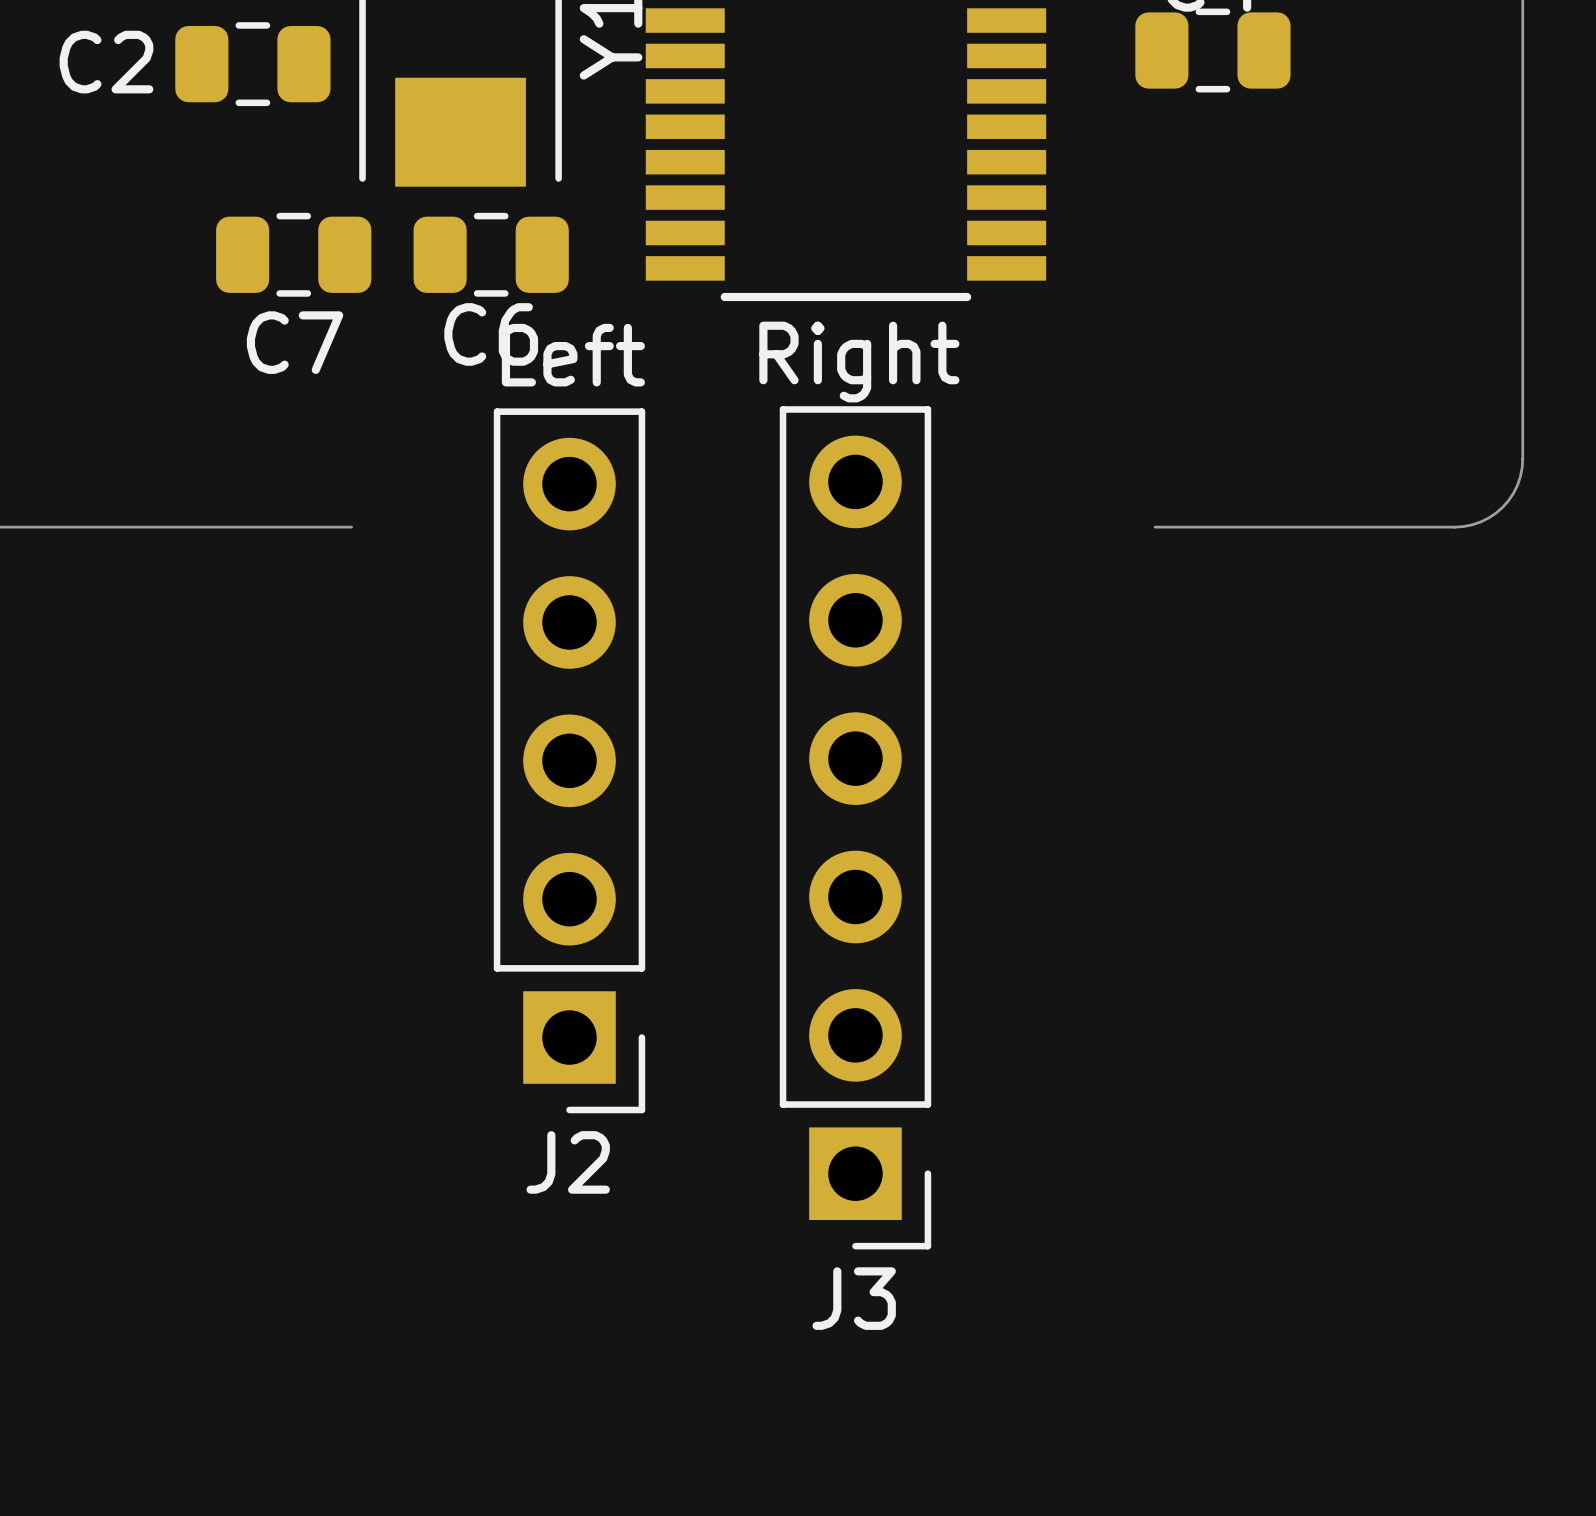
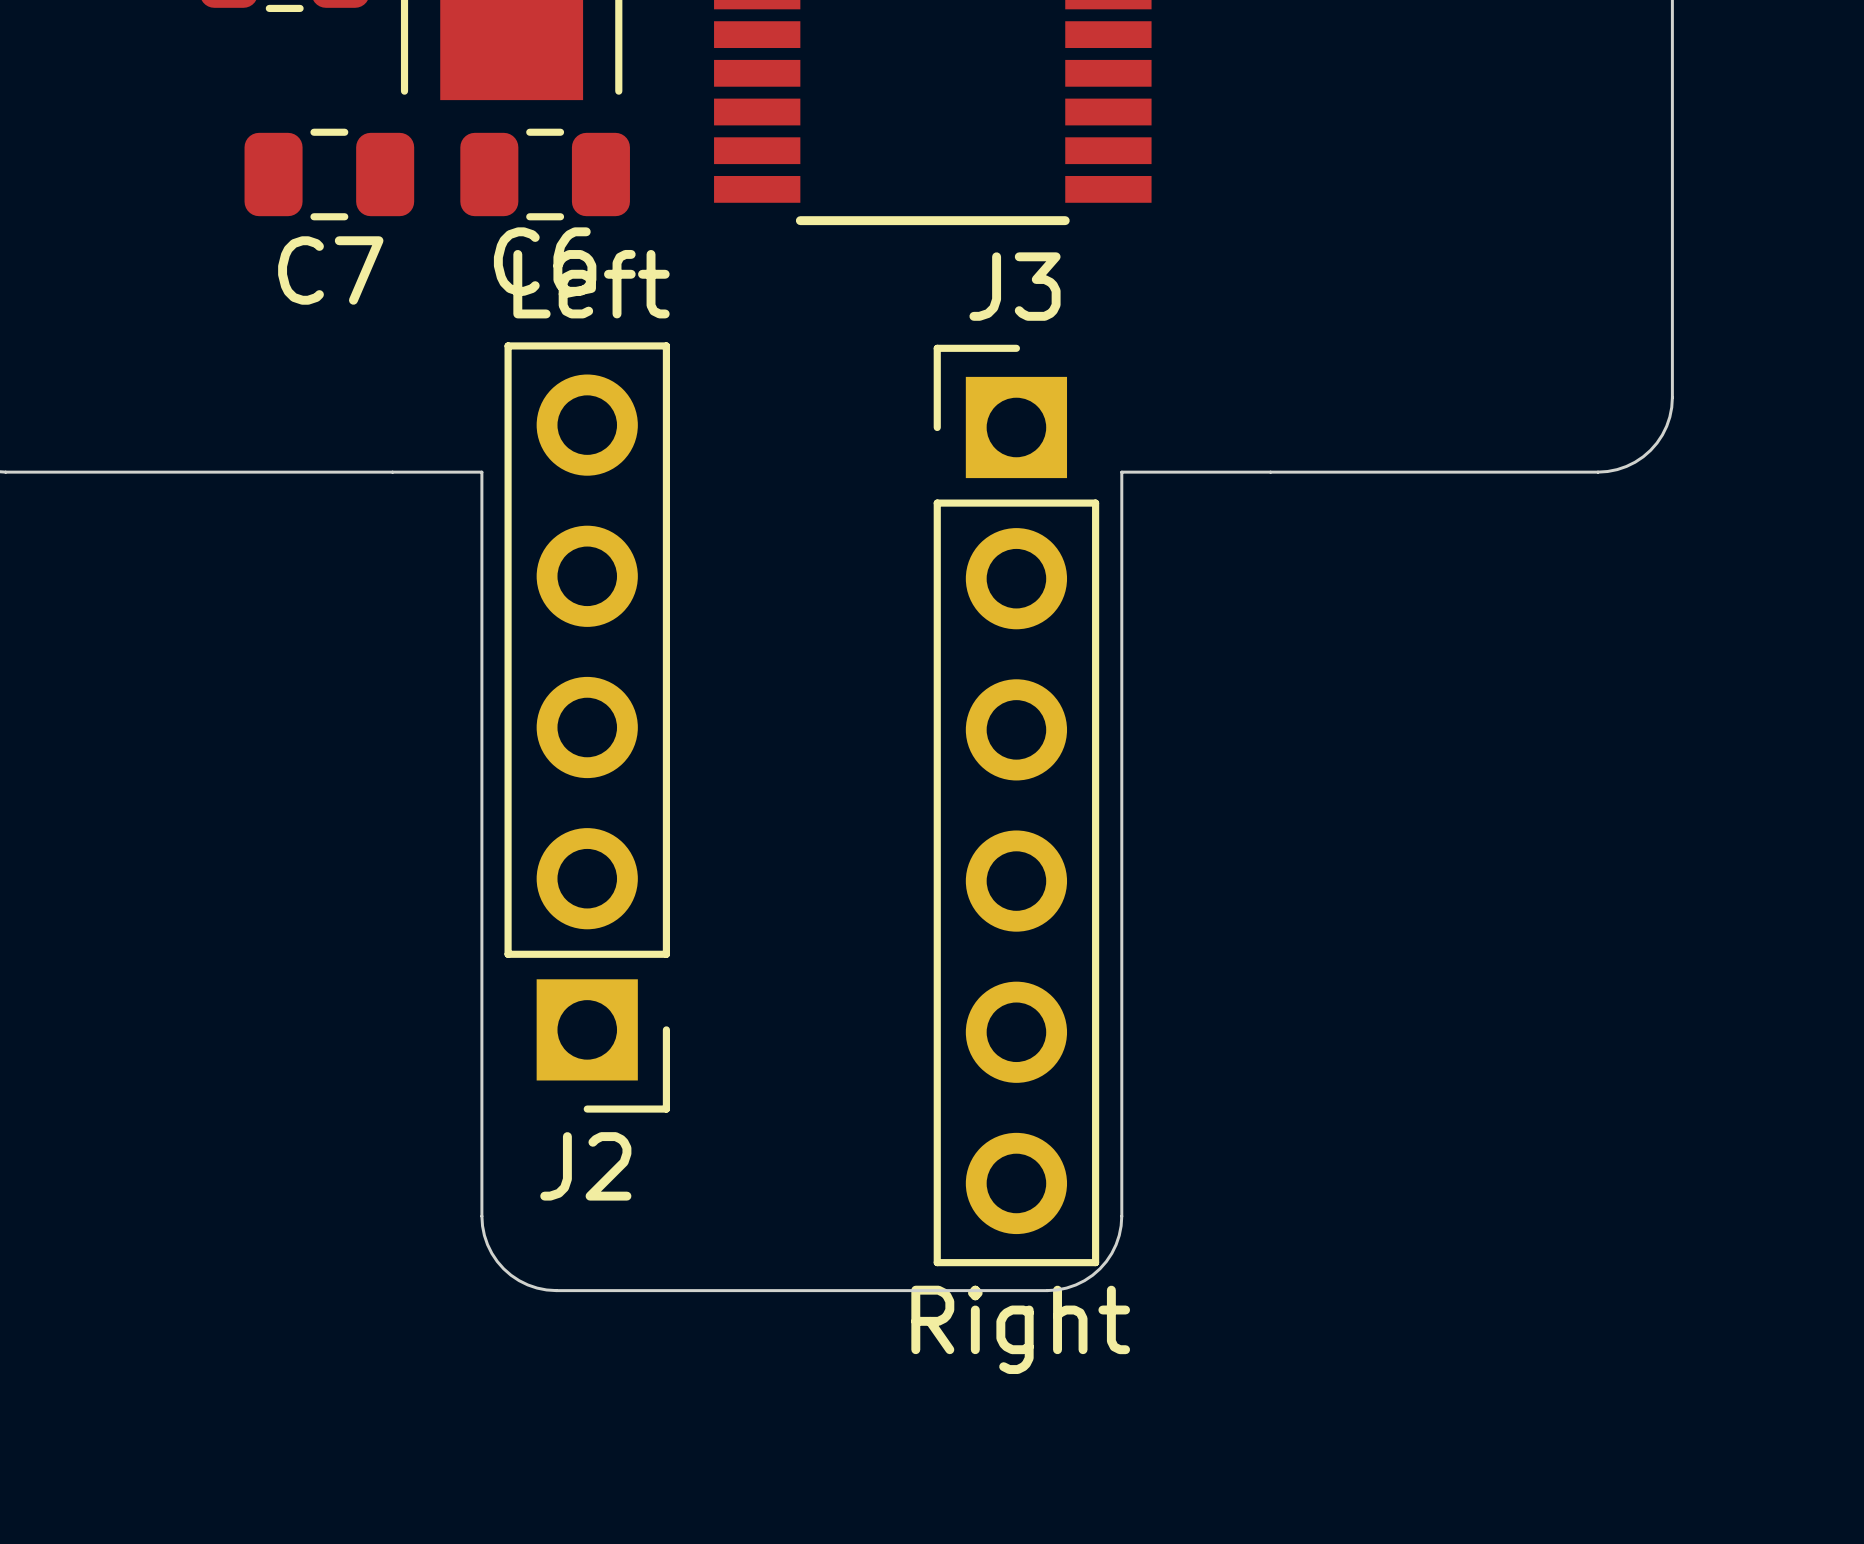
board edge: none -> (392, 472) (481, 472) (482, 1225) (487, 1244) (503, 1268) (527, 1284) (556, 1290) (1047, 1290) (1066, 1288) (1084, 1280) (1106, 1261) (1116, 1244) (1121, 1216) (1121, 472) (1270, 472)
J2 position: (569, 760) -> (587, 727)
J3 rotation: 0° (855, 827) -> 180° (1016, 805)

